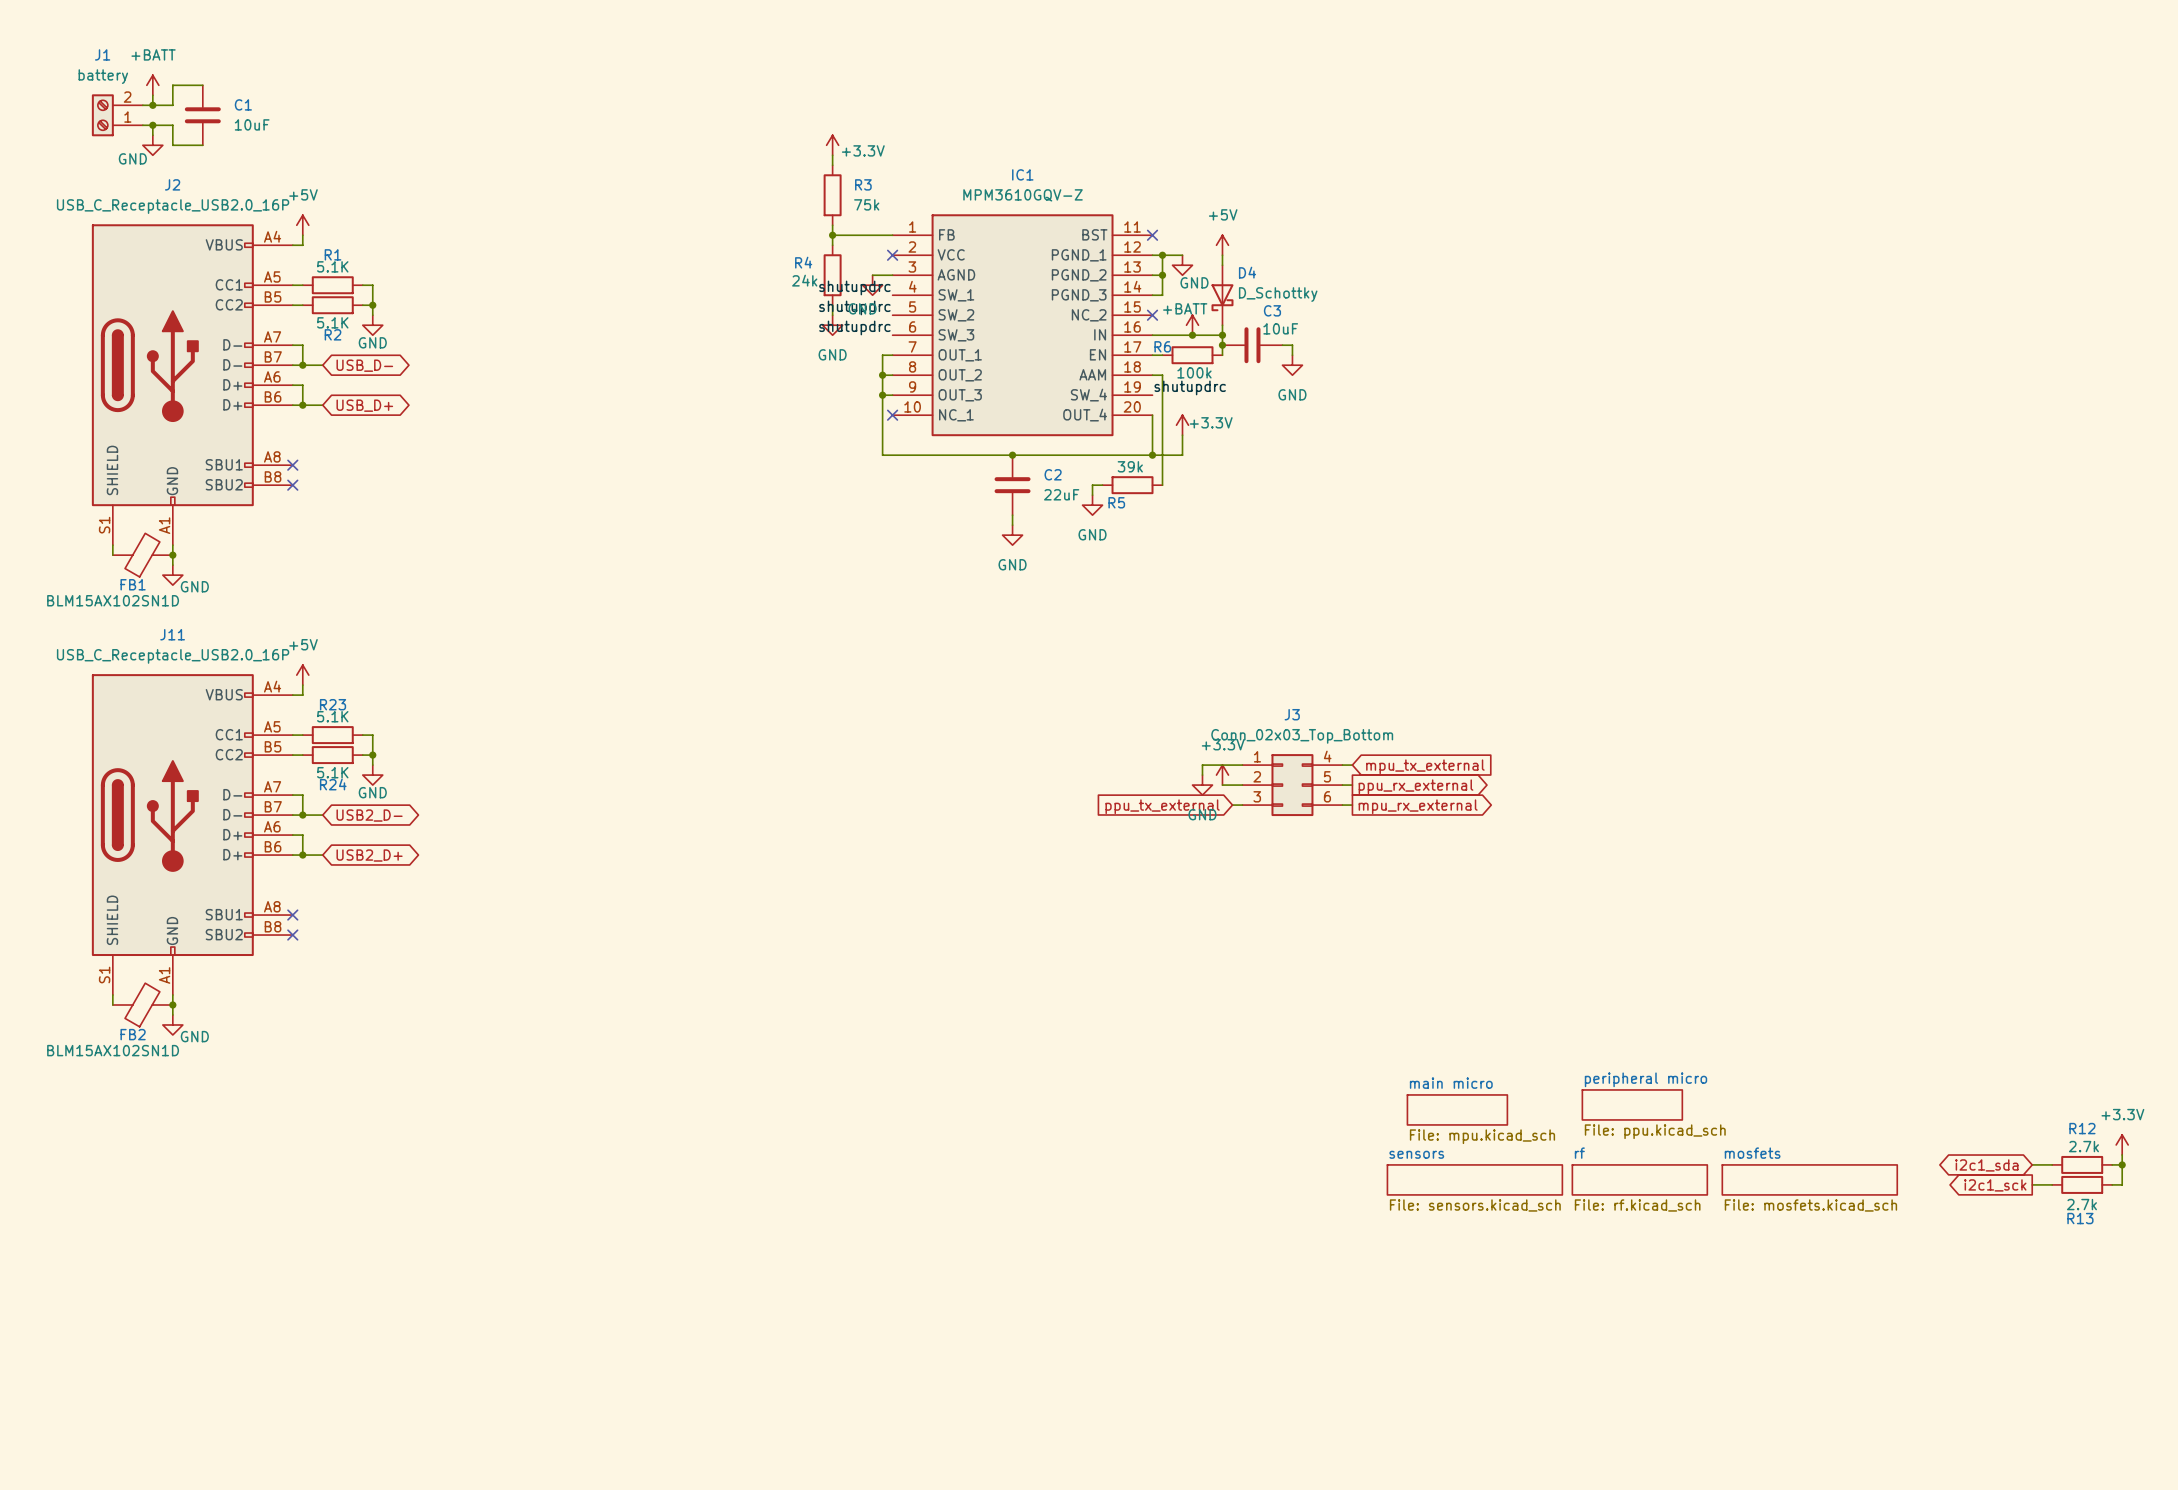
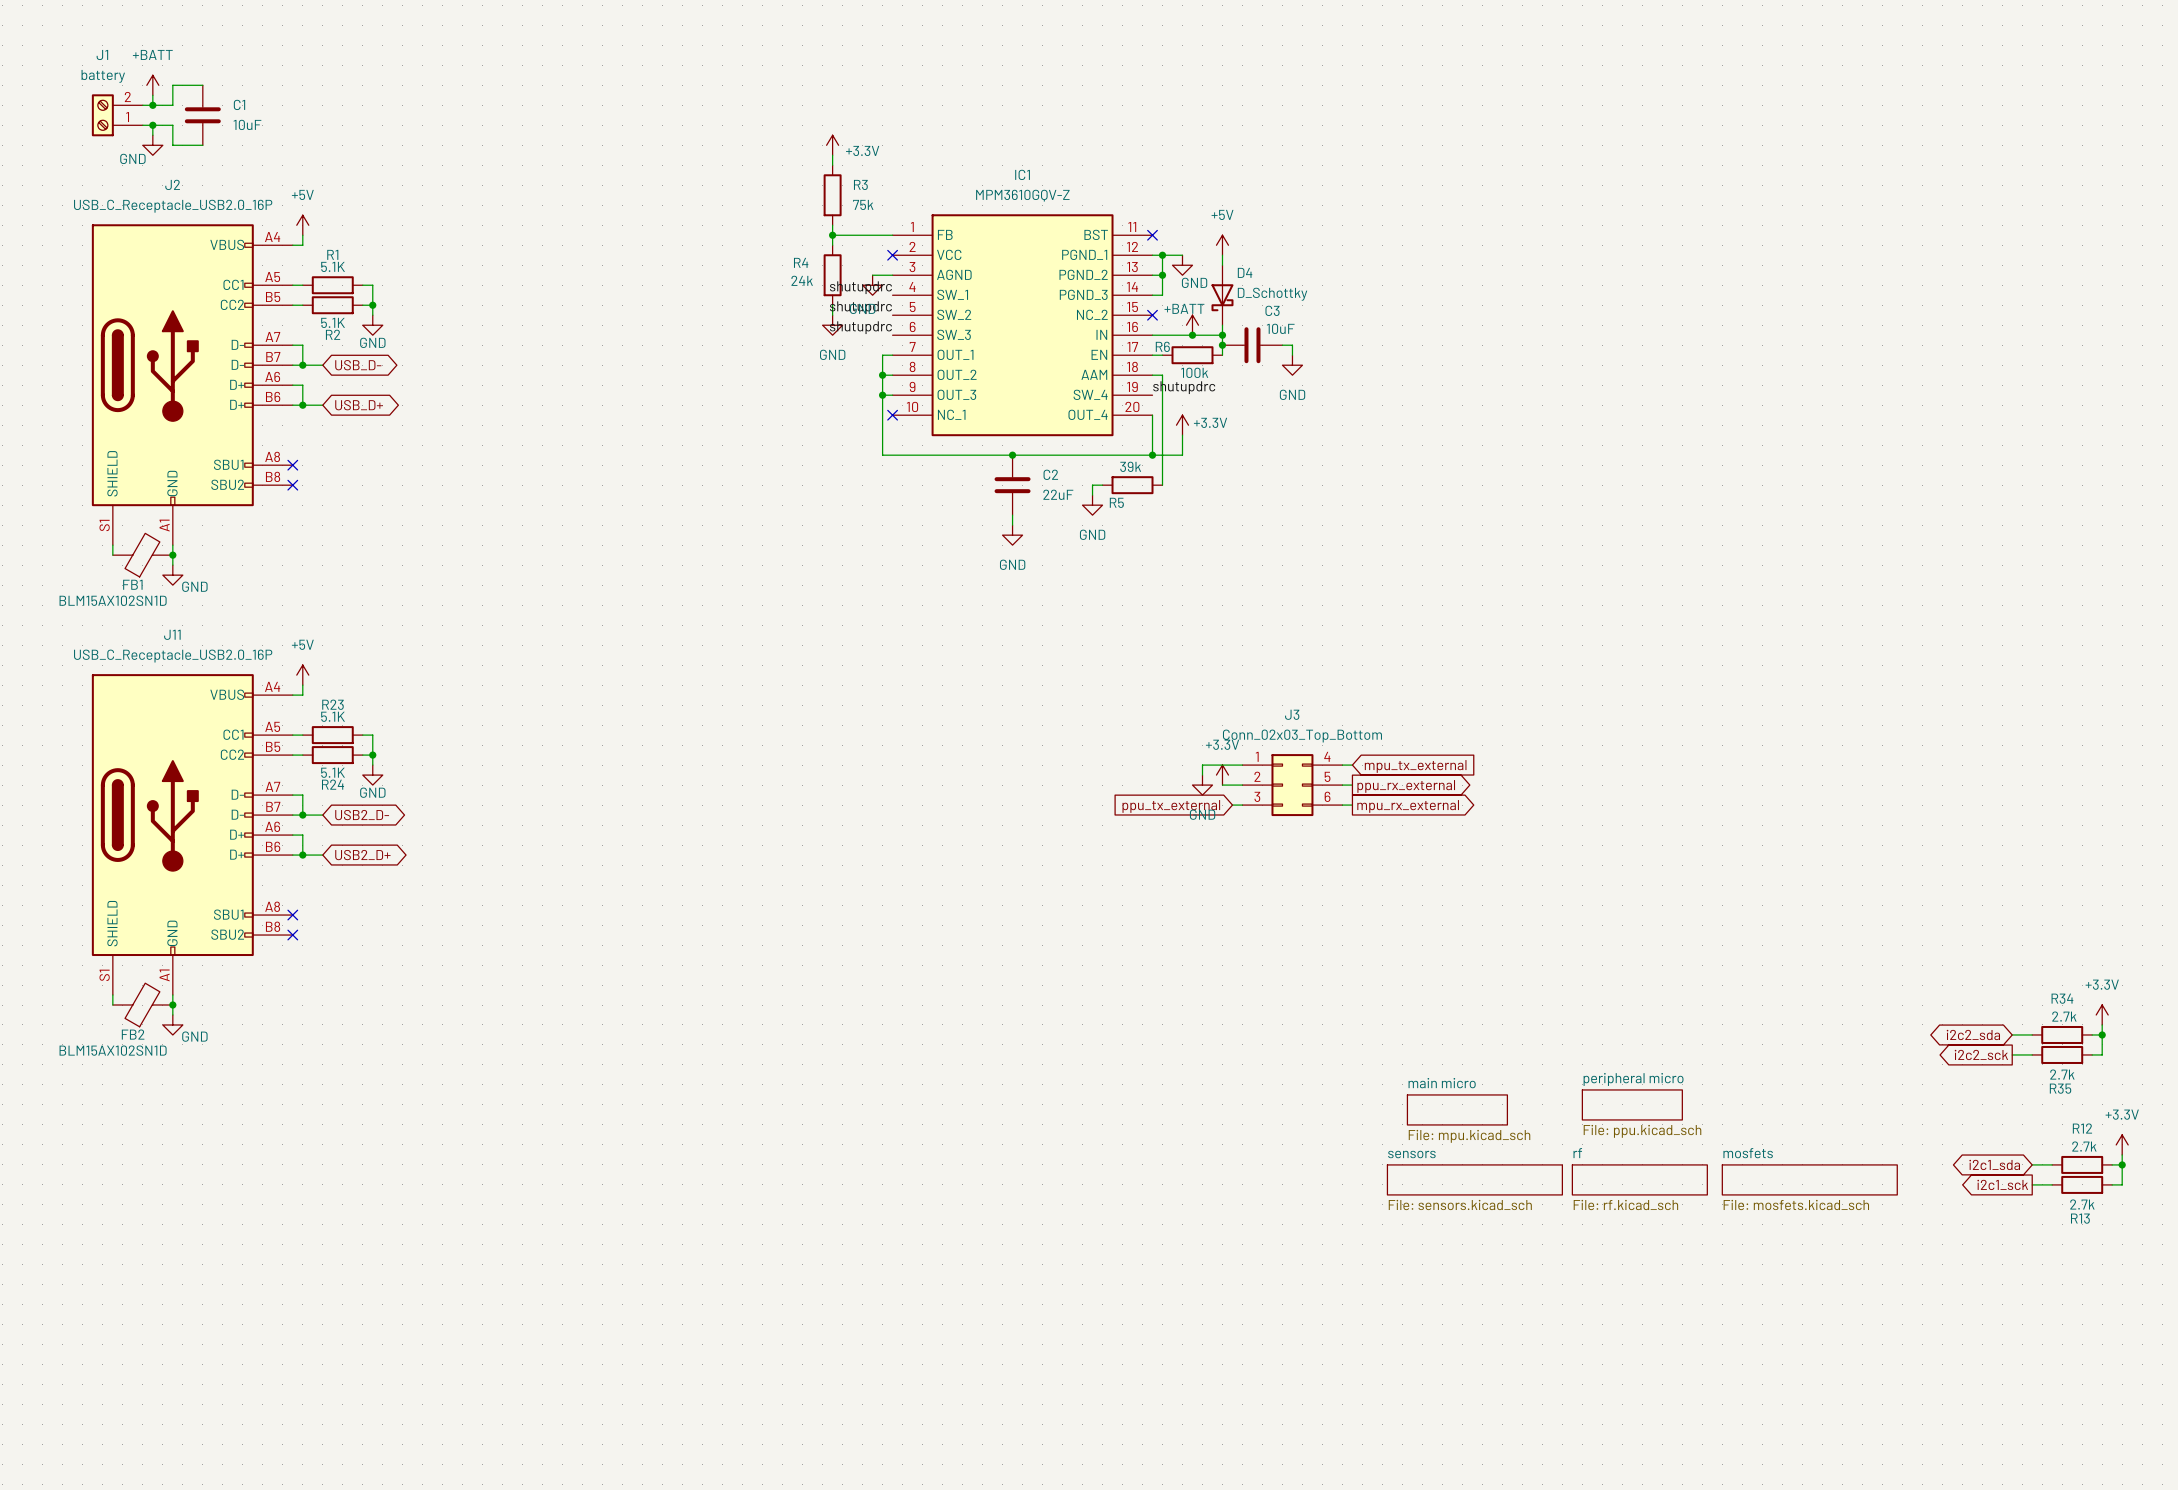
power symbol: none -> +3.3V (2102, 1014)
wire: none -> (2102, 1024) (2102, 1054) (2092, 1054)
wire: none -> (2012, 1034) (2032, 1034)
R34: none -> 2.7k (2062, 1034)
wire: none -> (2092, 1034) (2102, 1034)
junction: none -> (2102, 1034)
global label: none -> i2c2_sda (1973, 1034)
wire: none -> (2012, 1054) (2032, 1054)
R35: none -> 2.7k (2062, 1054)
global label: none -> i2c2_sck (1981, 1054)

